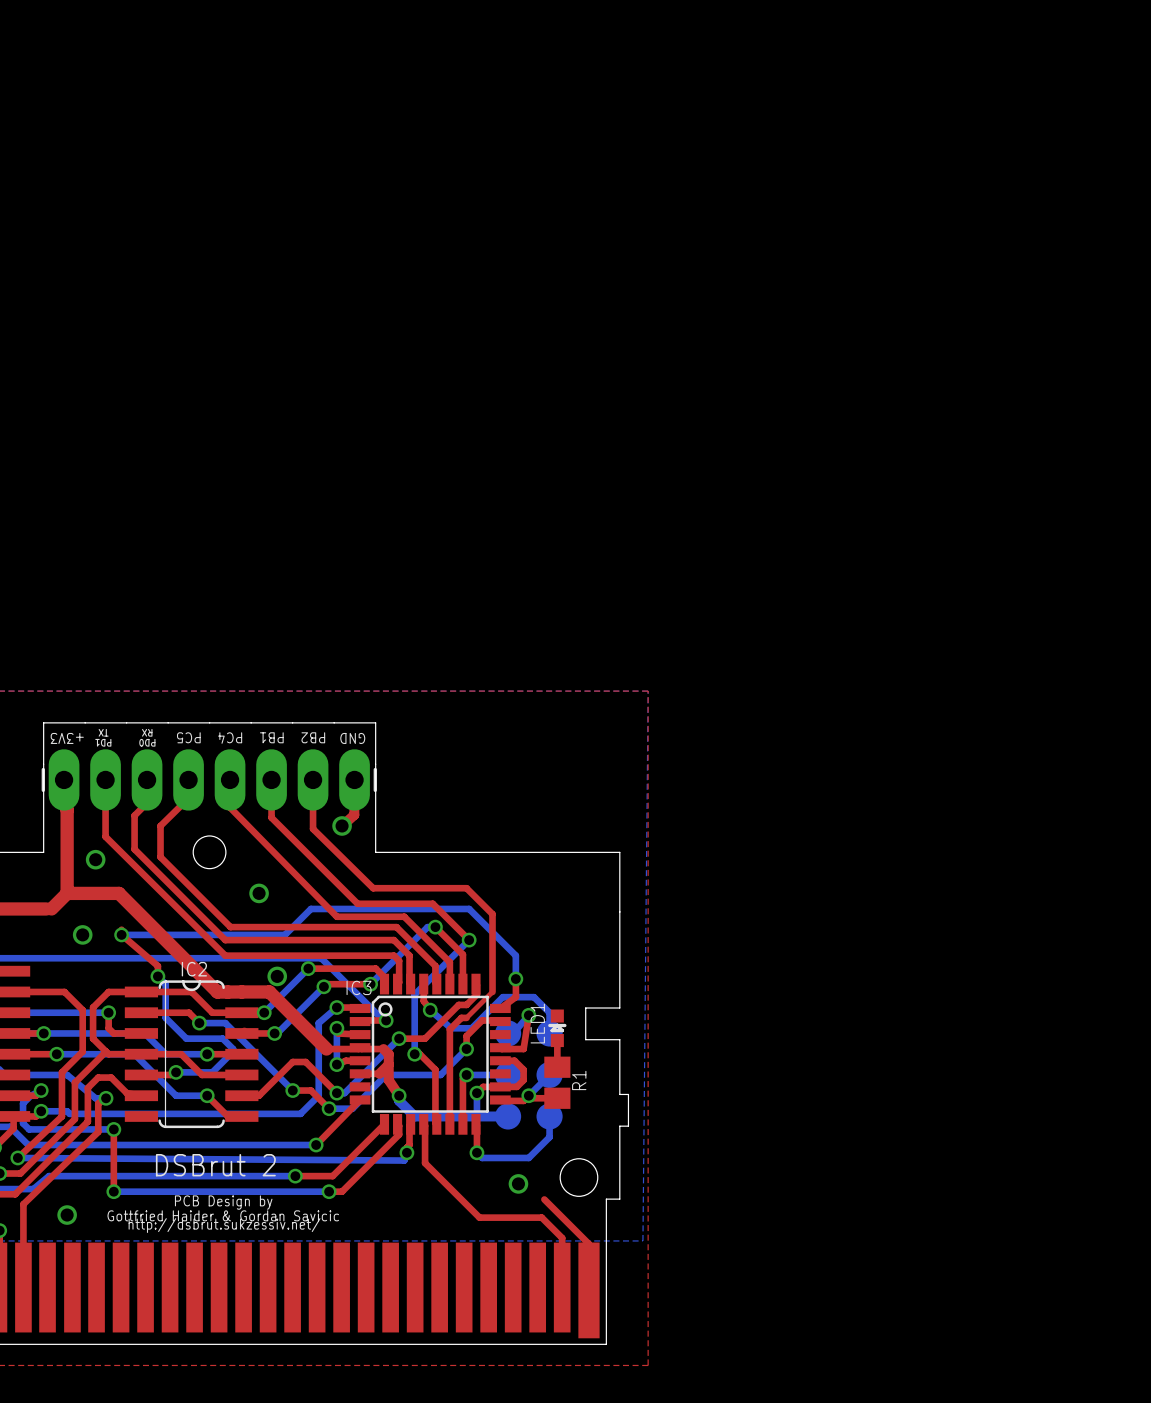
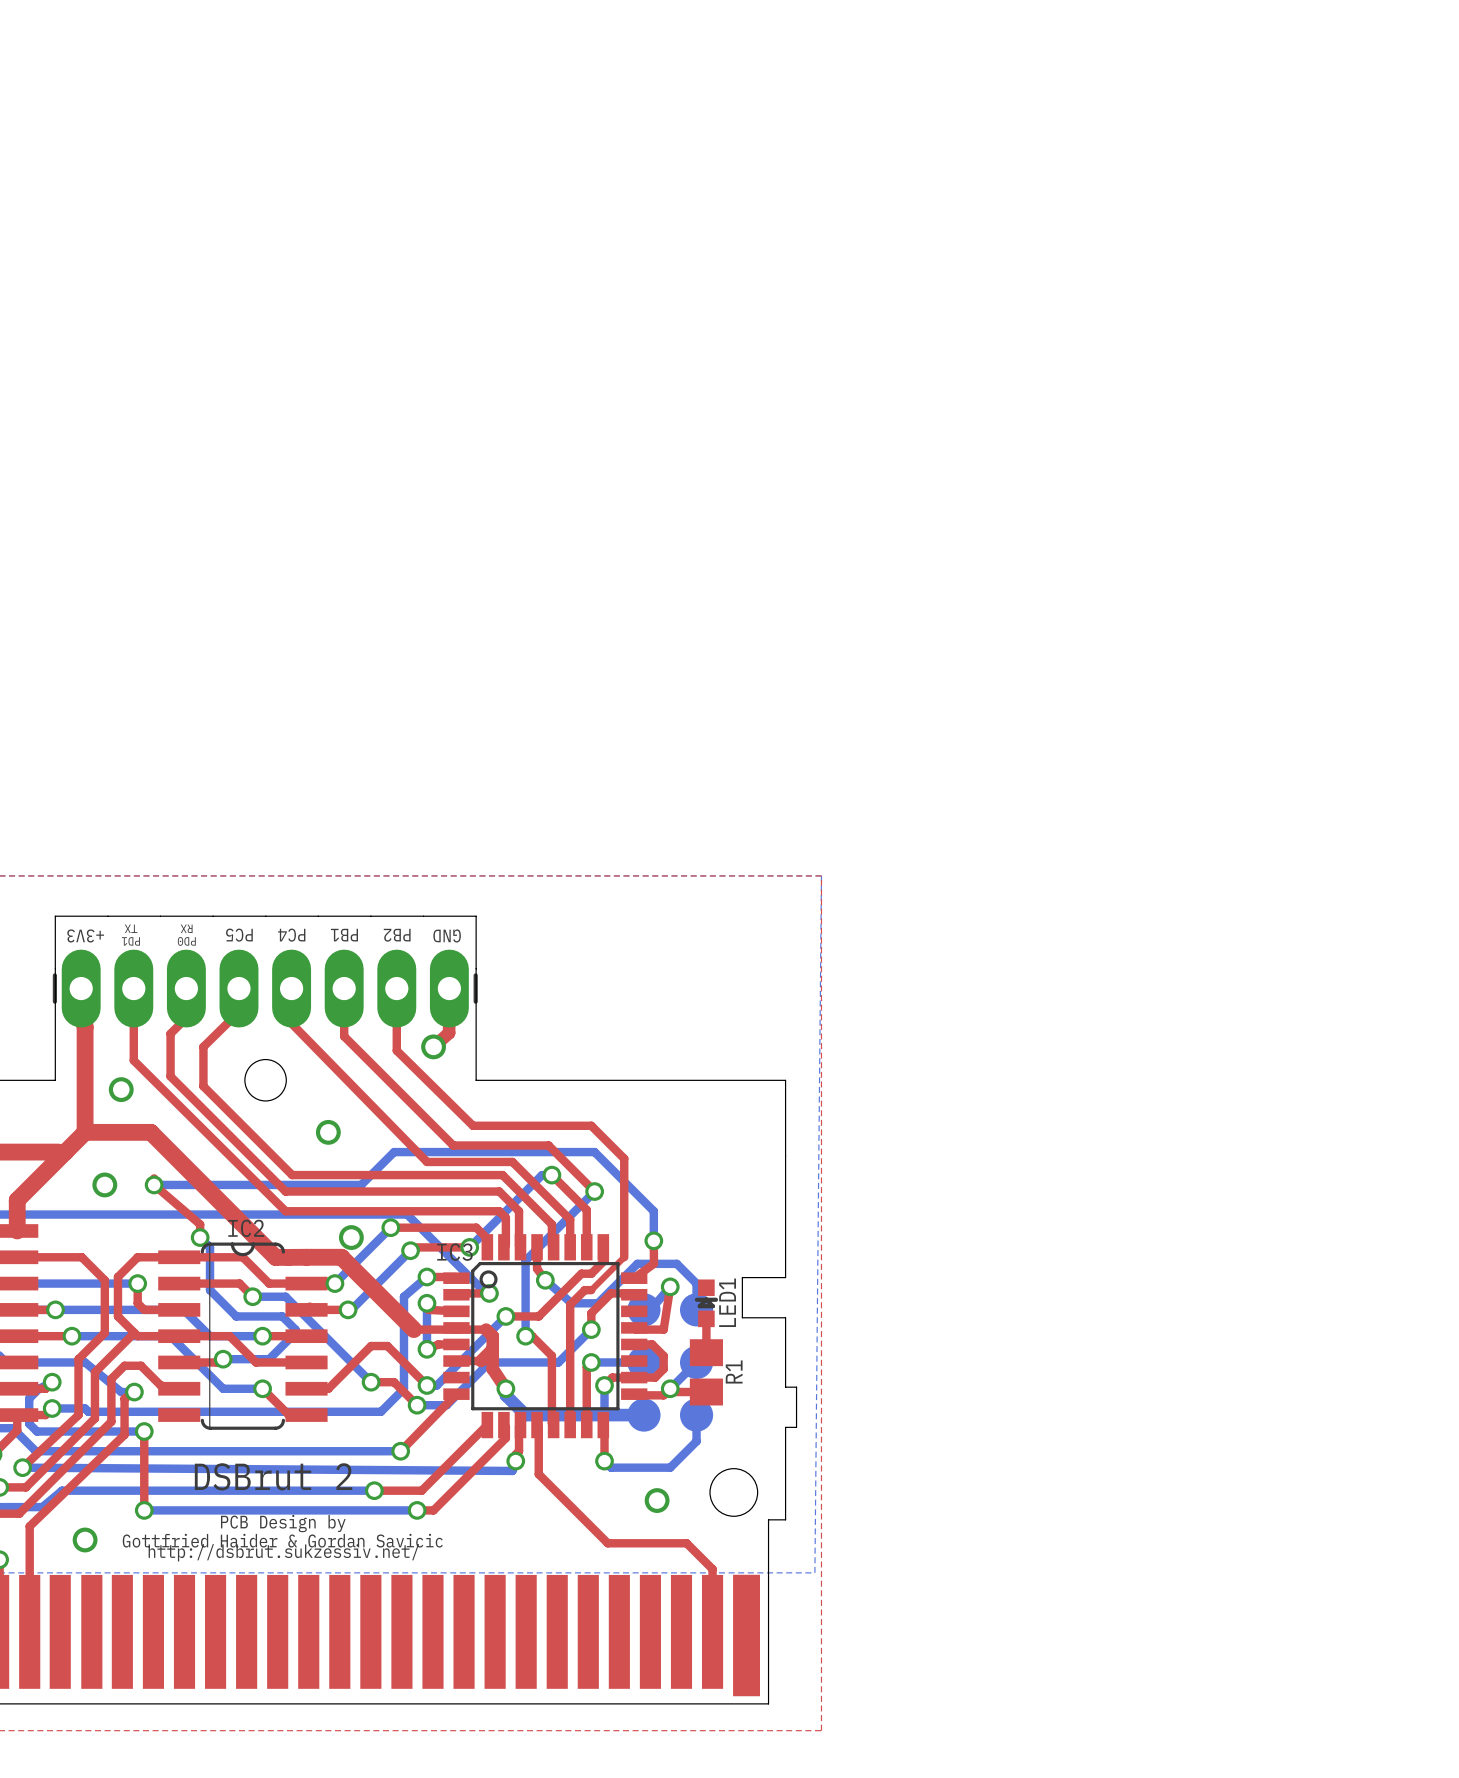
top track: none -> (65, 1152) (17, 1200) (17, 1230)
LED1 name position: LED1 (537, 1023) -> LED1 (727, 1302)
top track: (544, 1199) (589, 1244) (589, 1290) -> none

